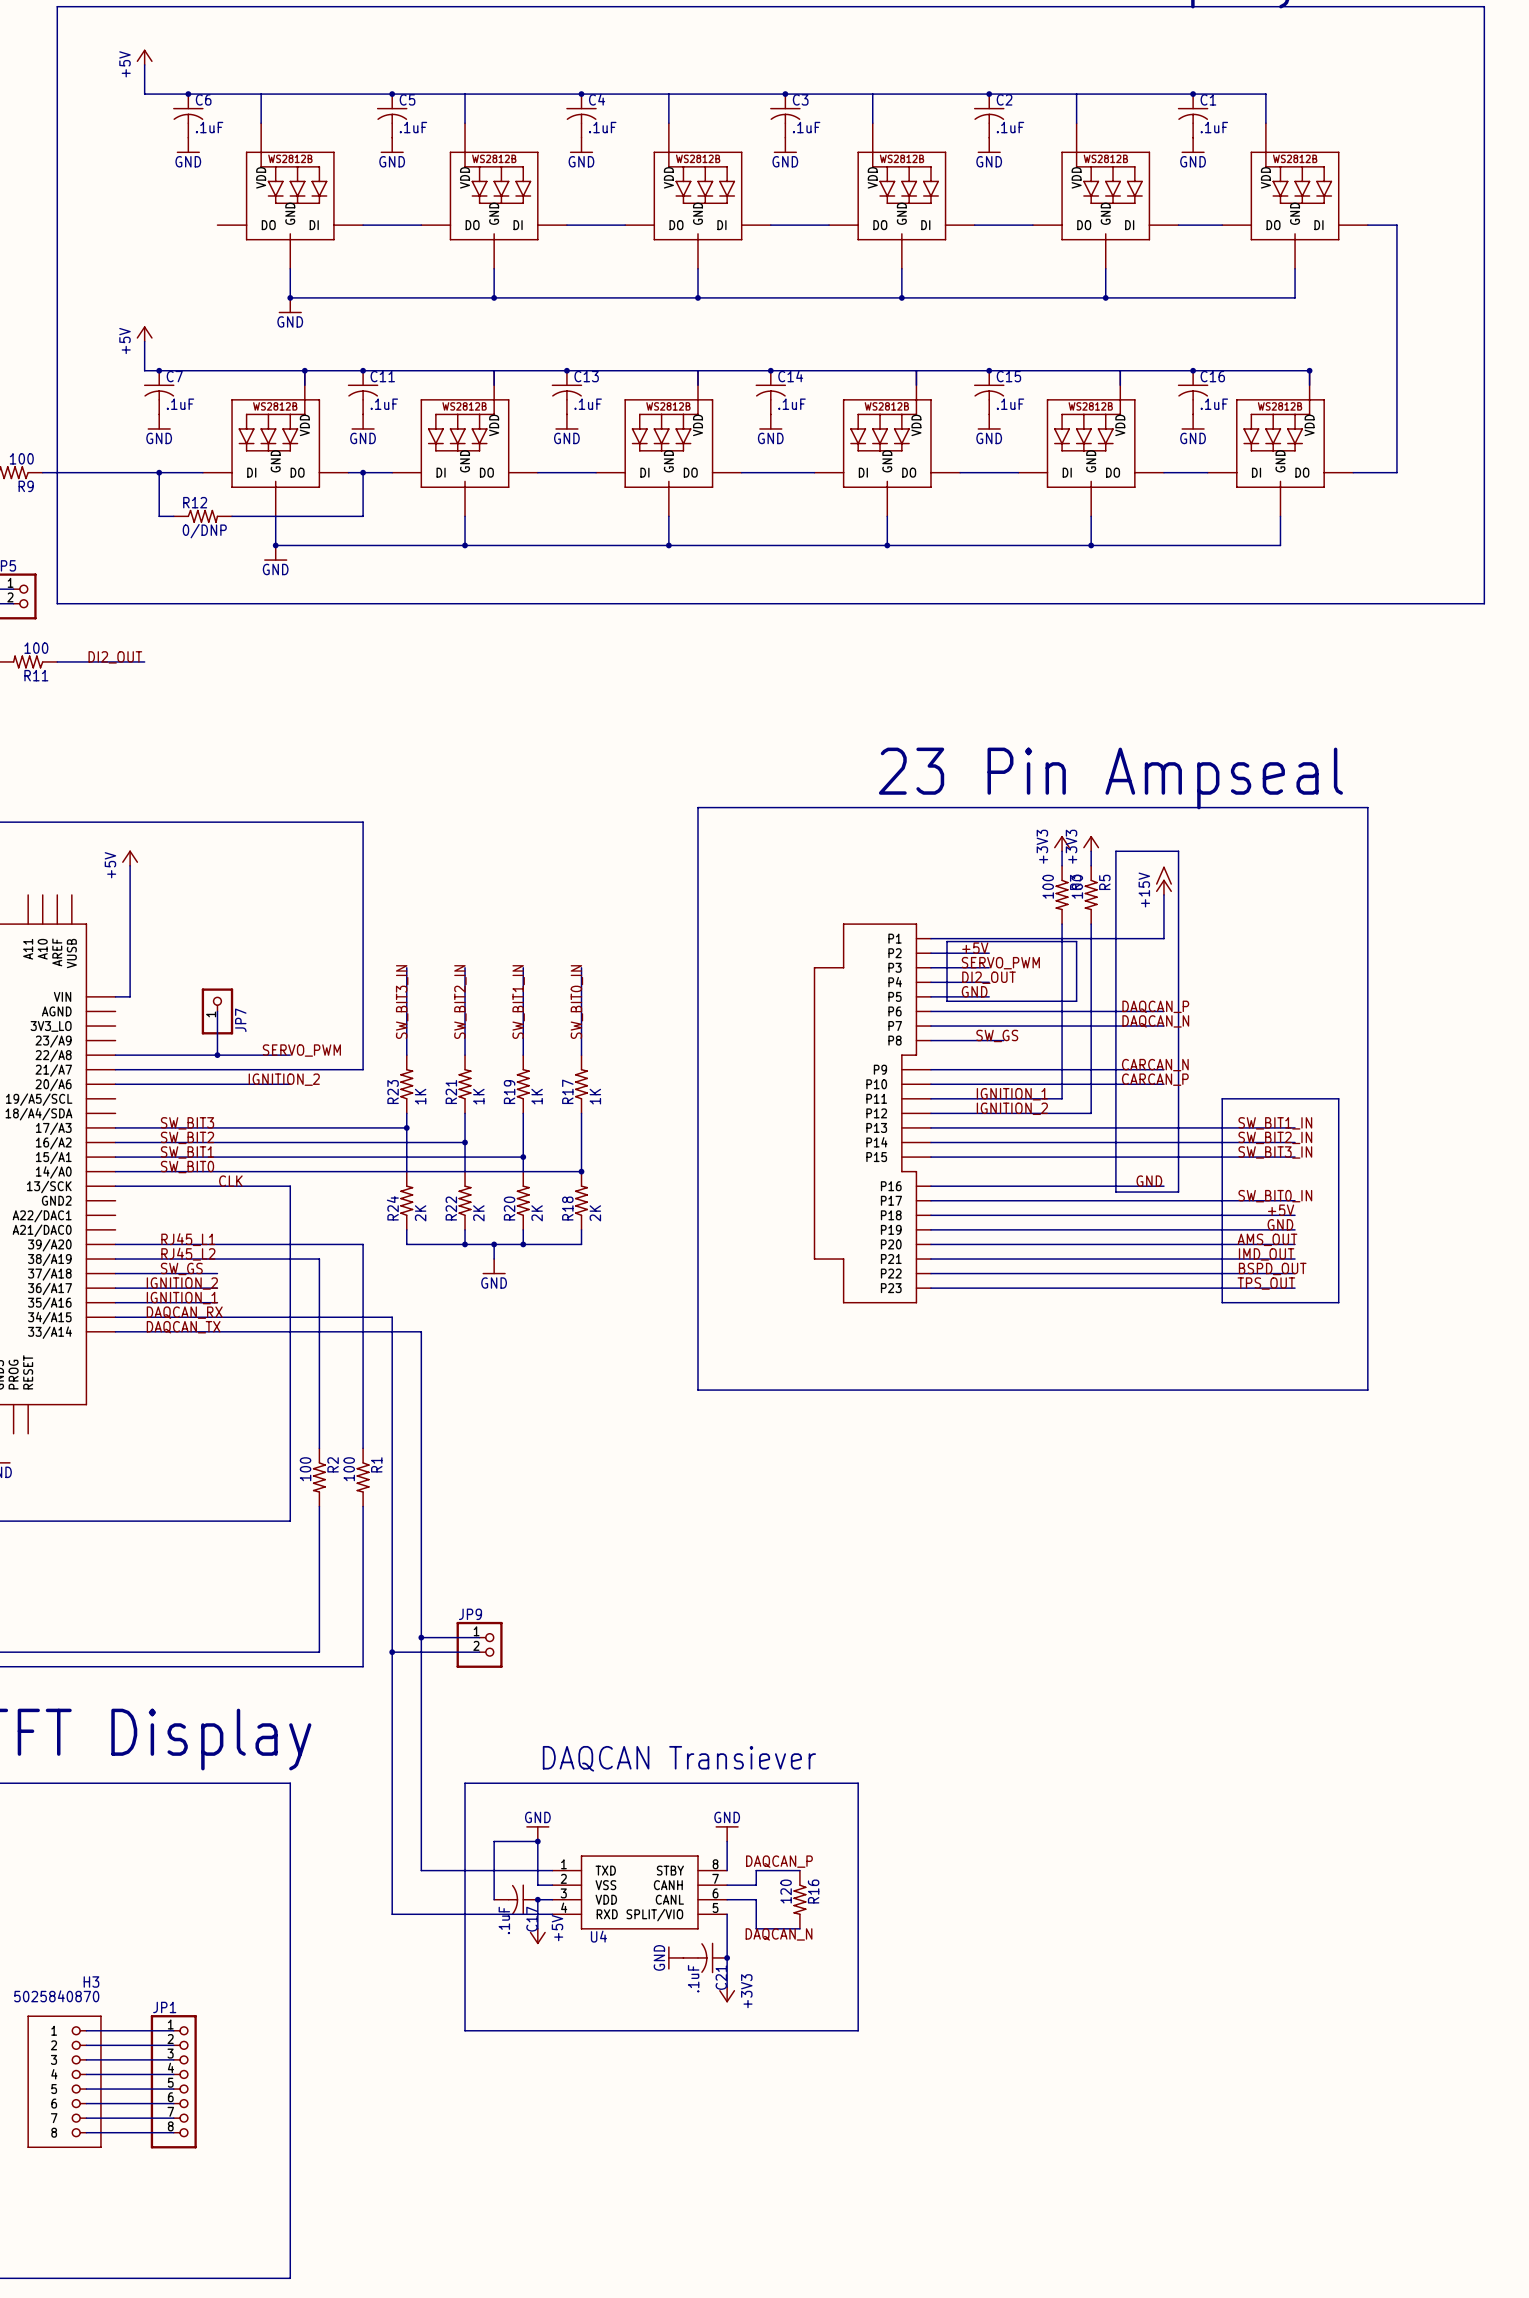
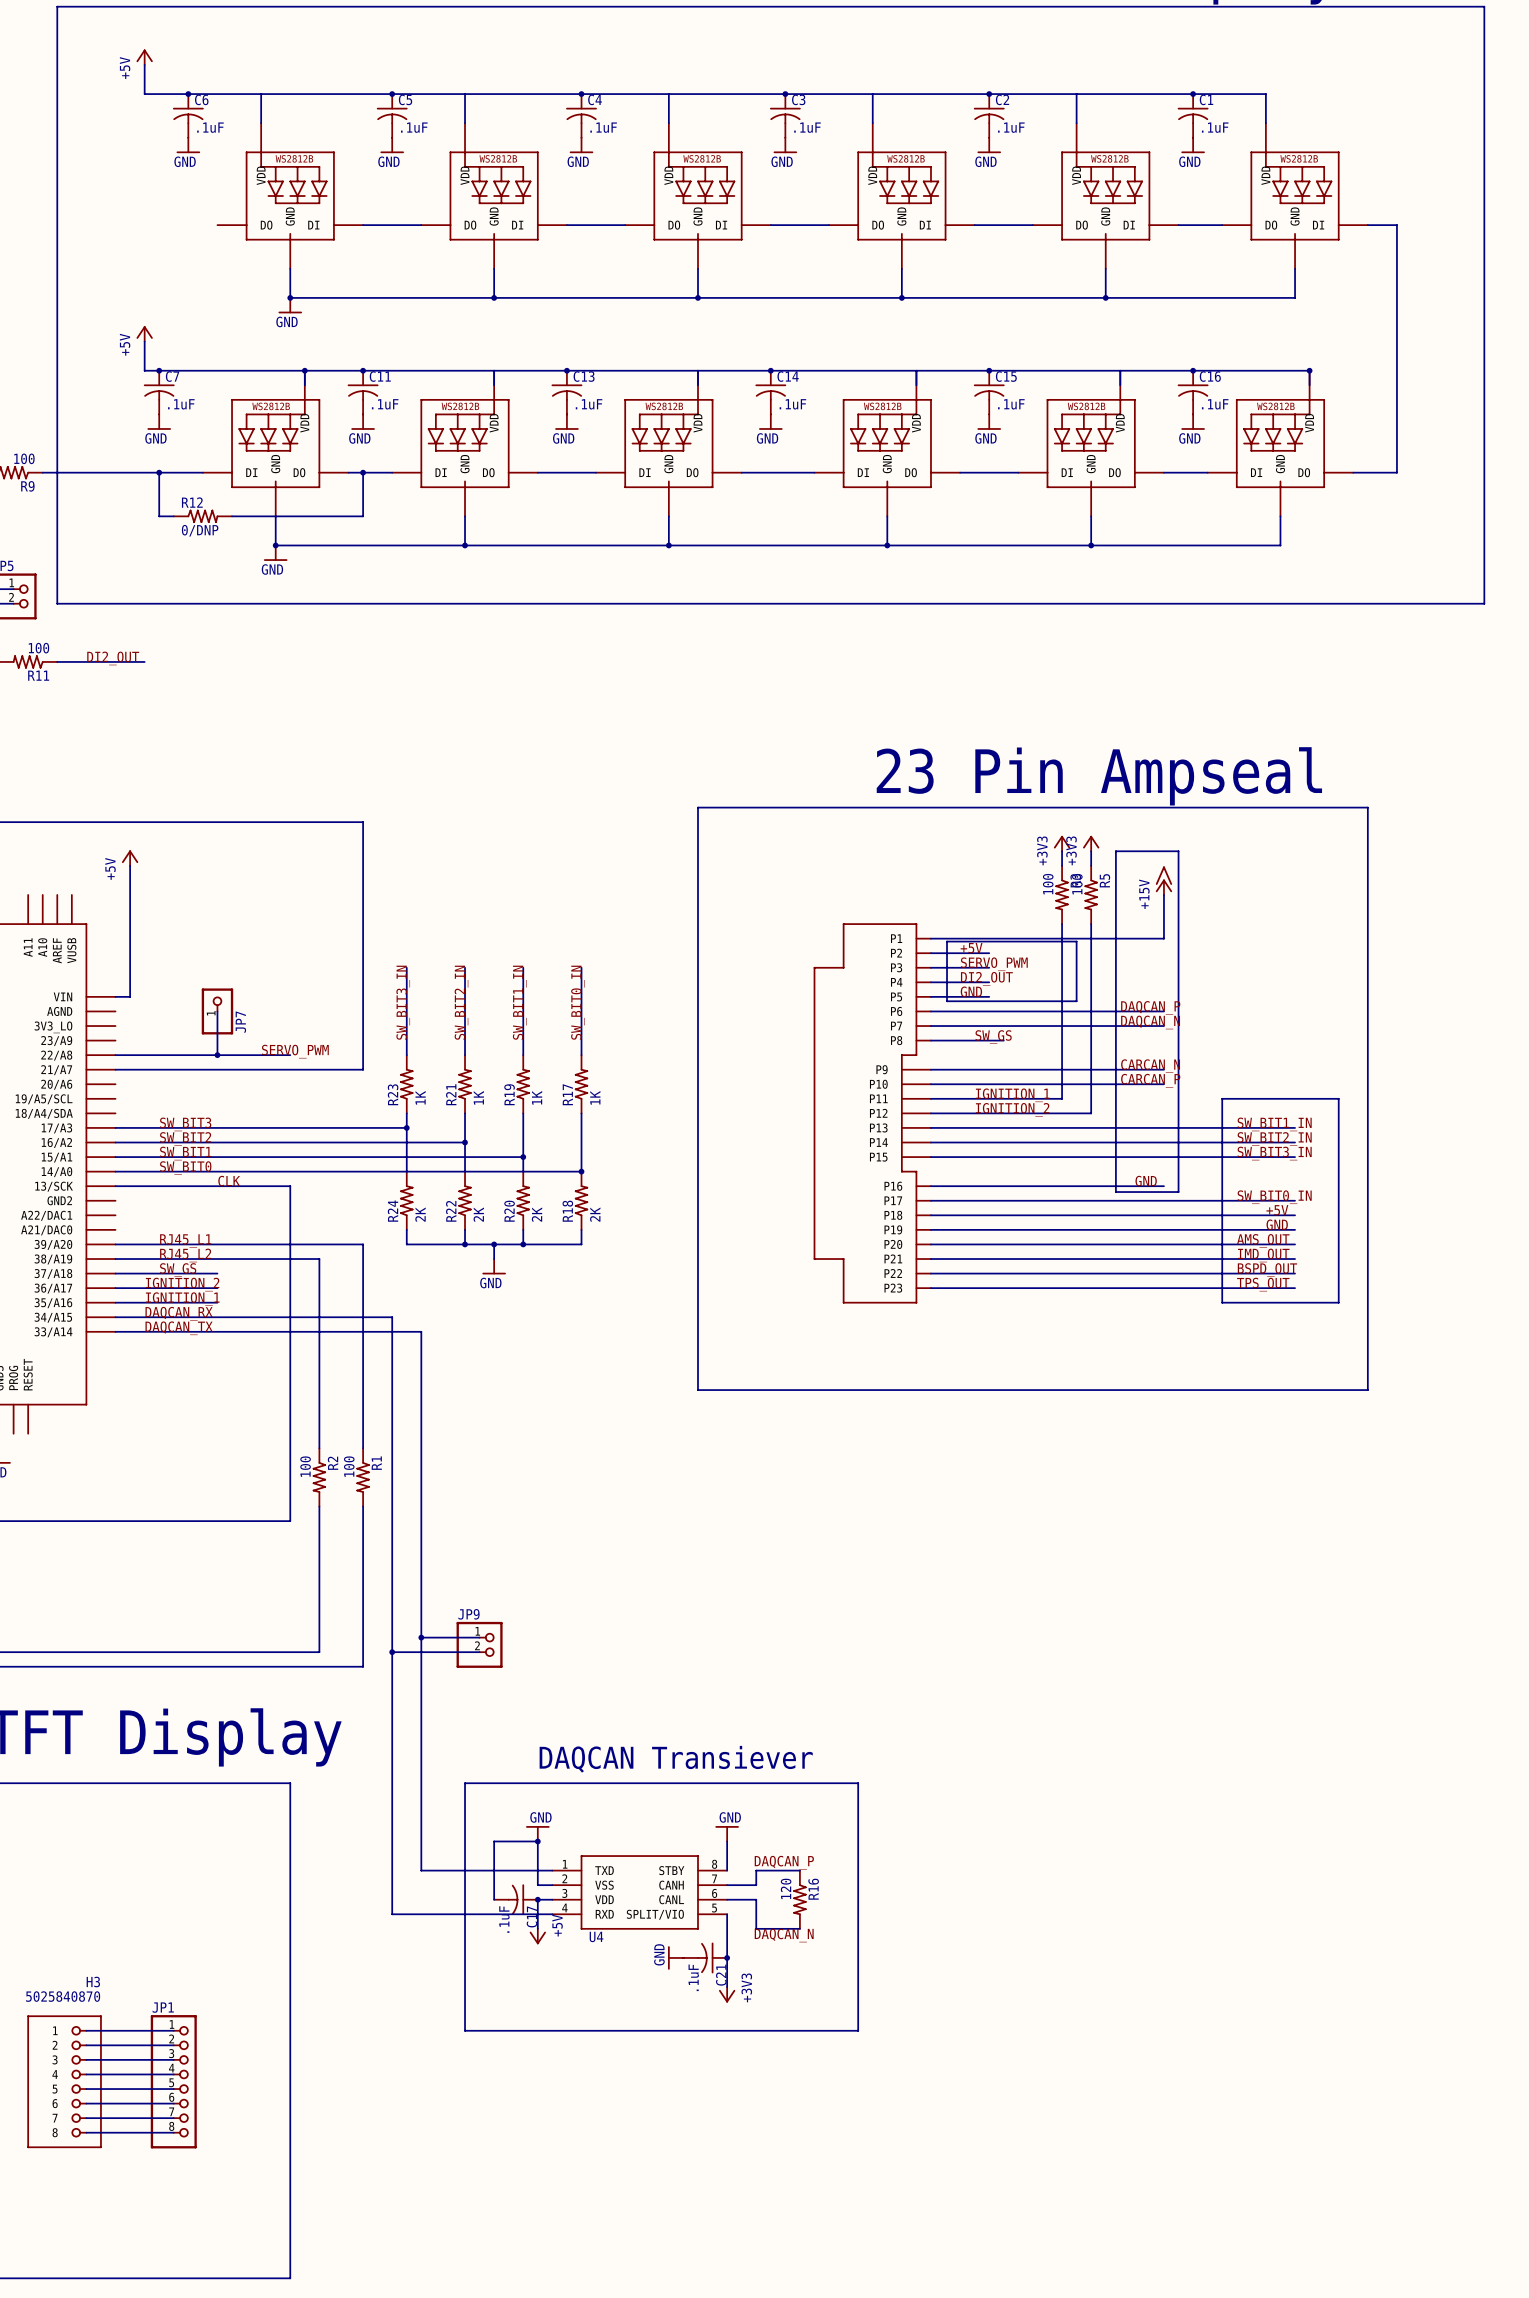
label: IGNITION_2 (284, 1079) -> none
wire: (115, 1084) (290, 1084) -> none

